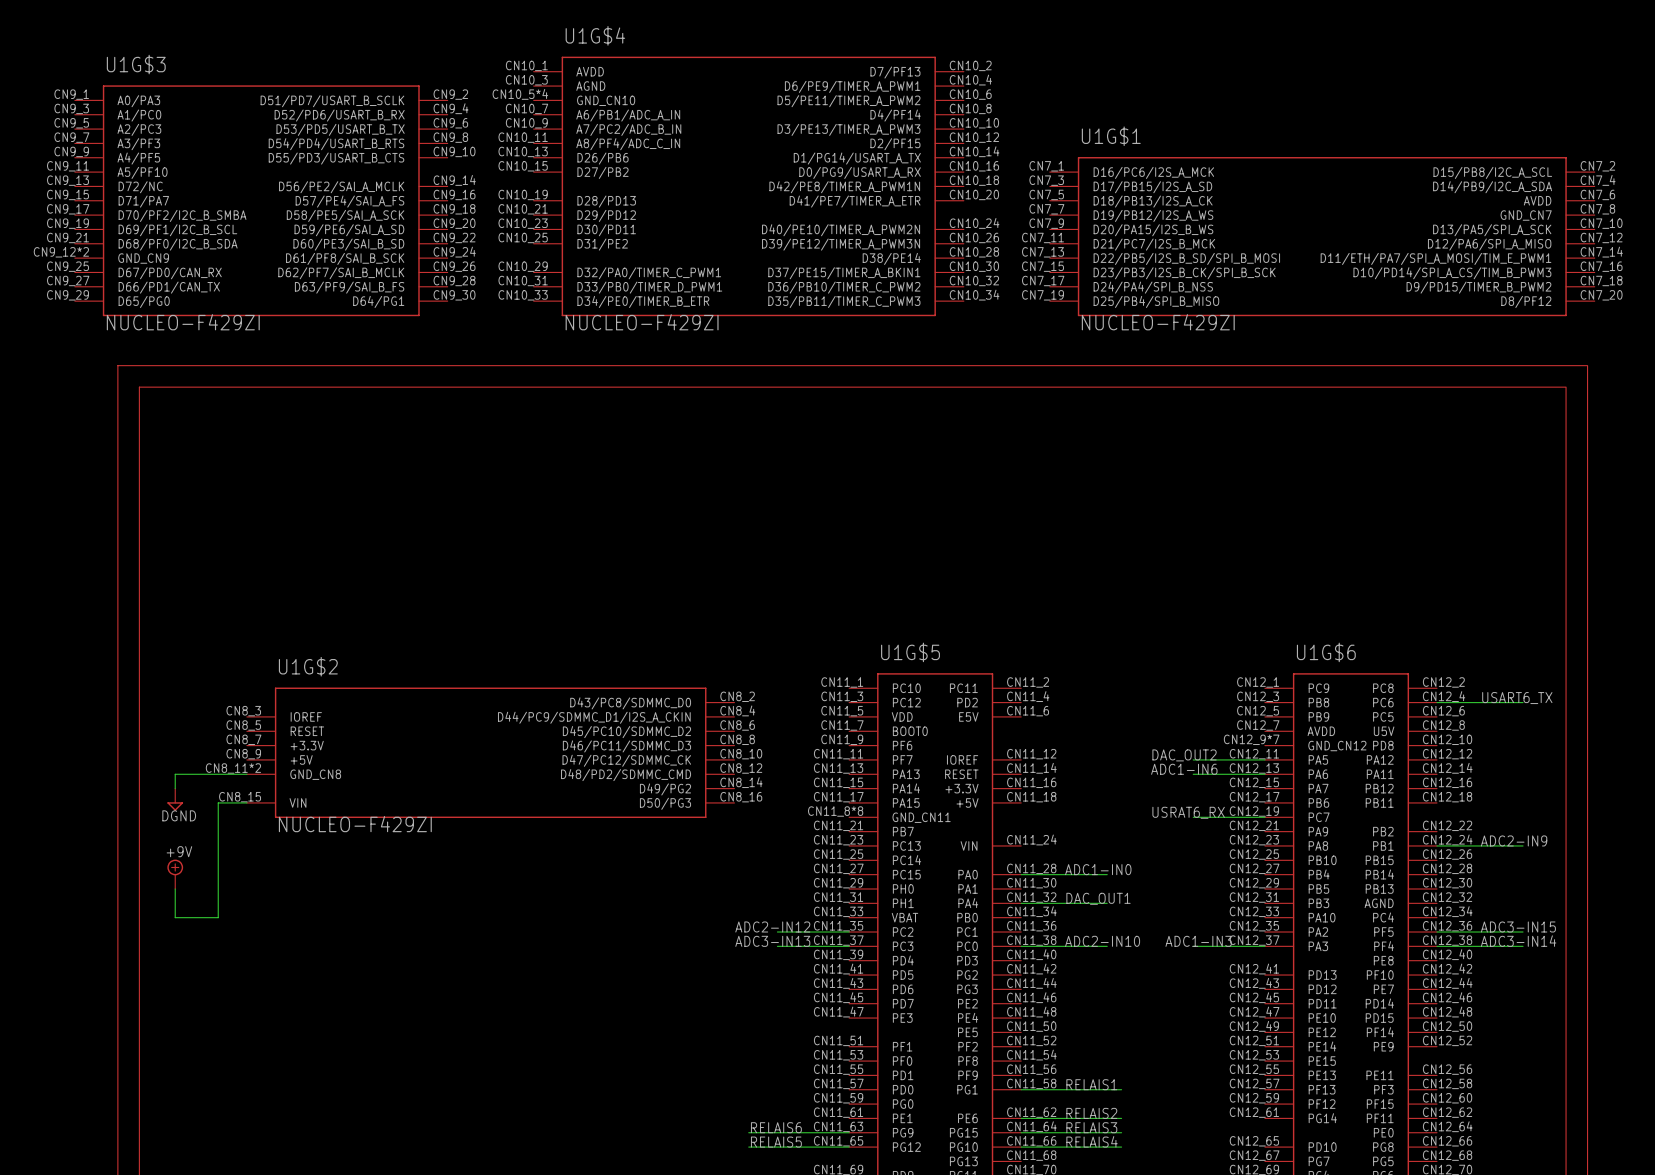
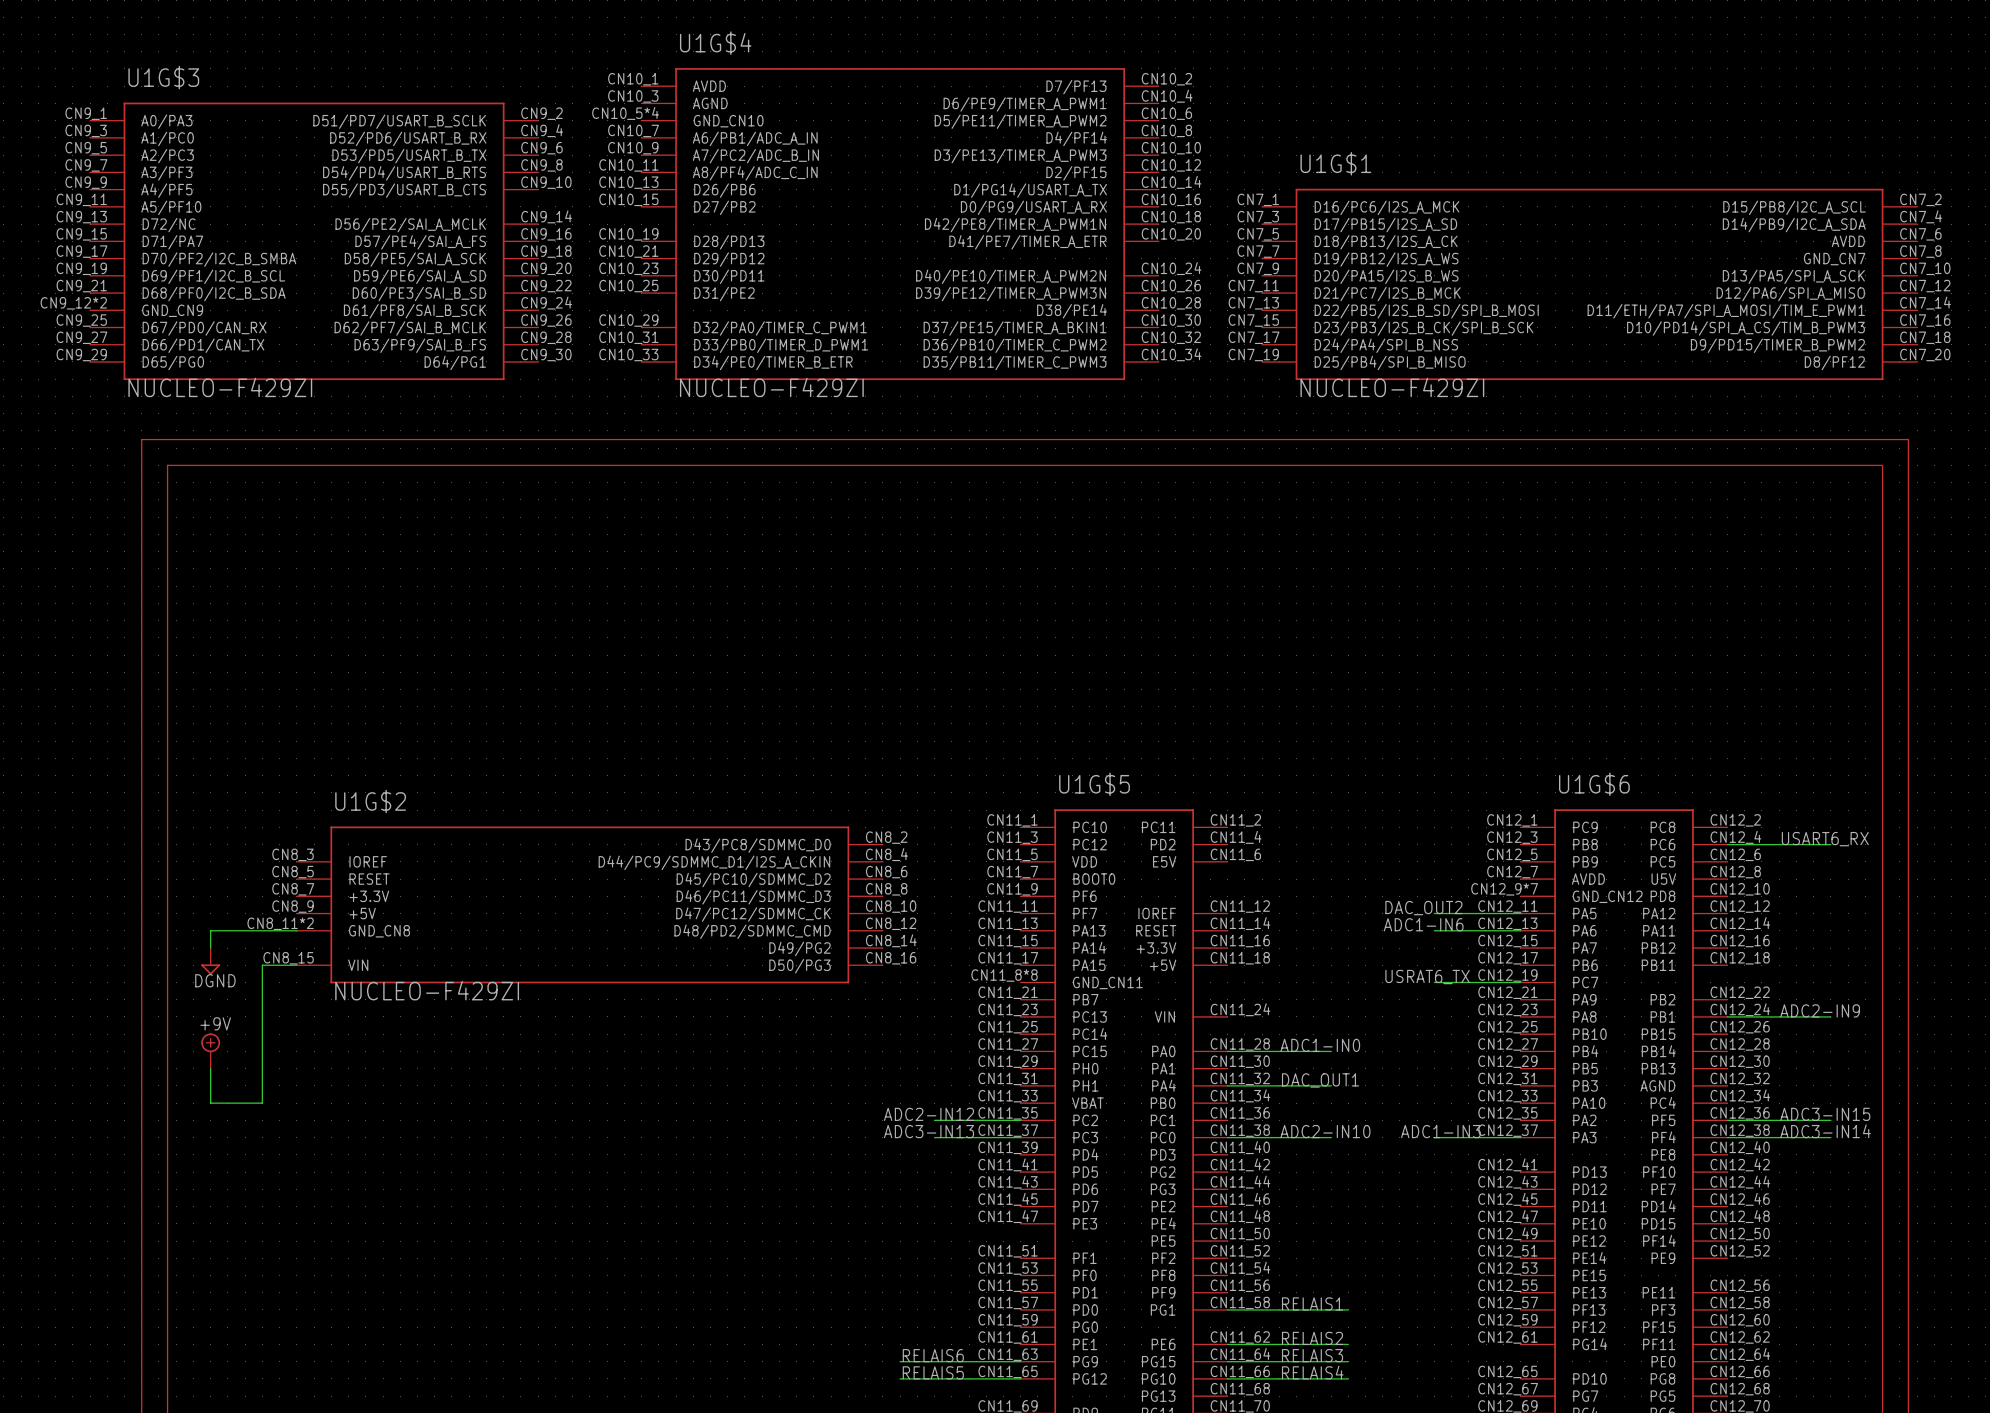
label: USART6_TX (1517, 698) -> USART6_RX (1825, 839)
label: USRAT6_RX (1188, 812) -> USRAT6_TX (1427, 977)

